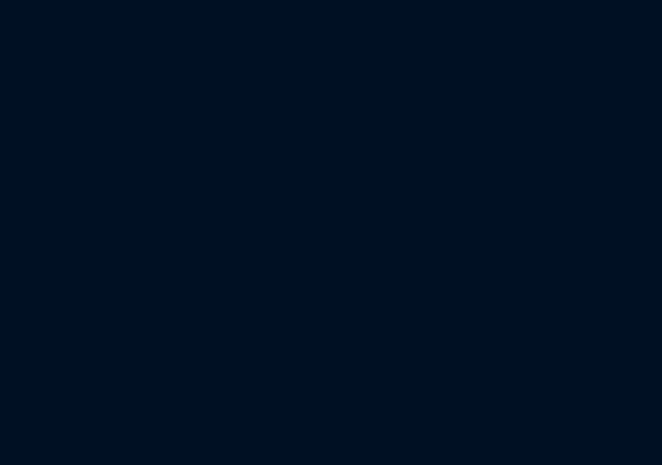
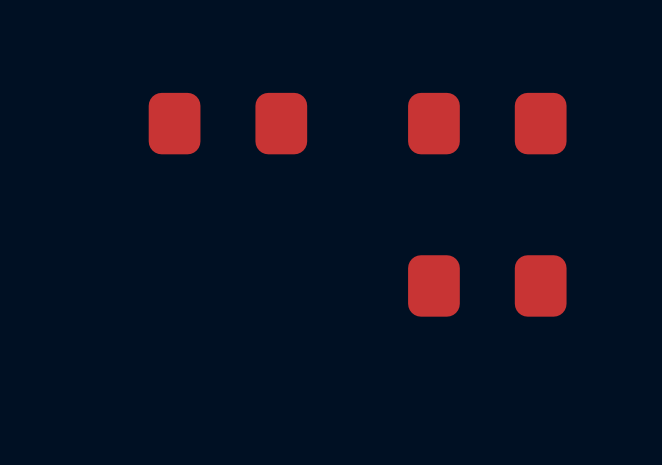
part: none -> (227, 123)
part: none -> (487, 123)
part: none -> (487, 285)

